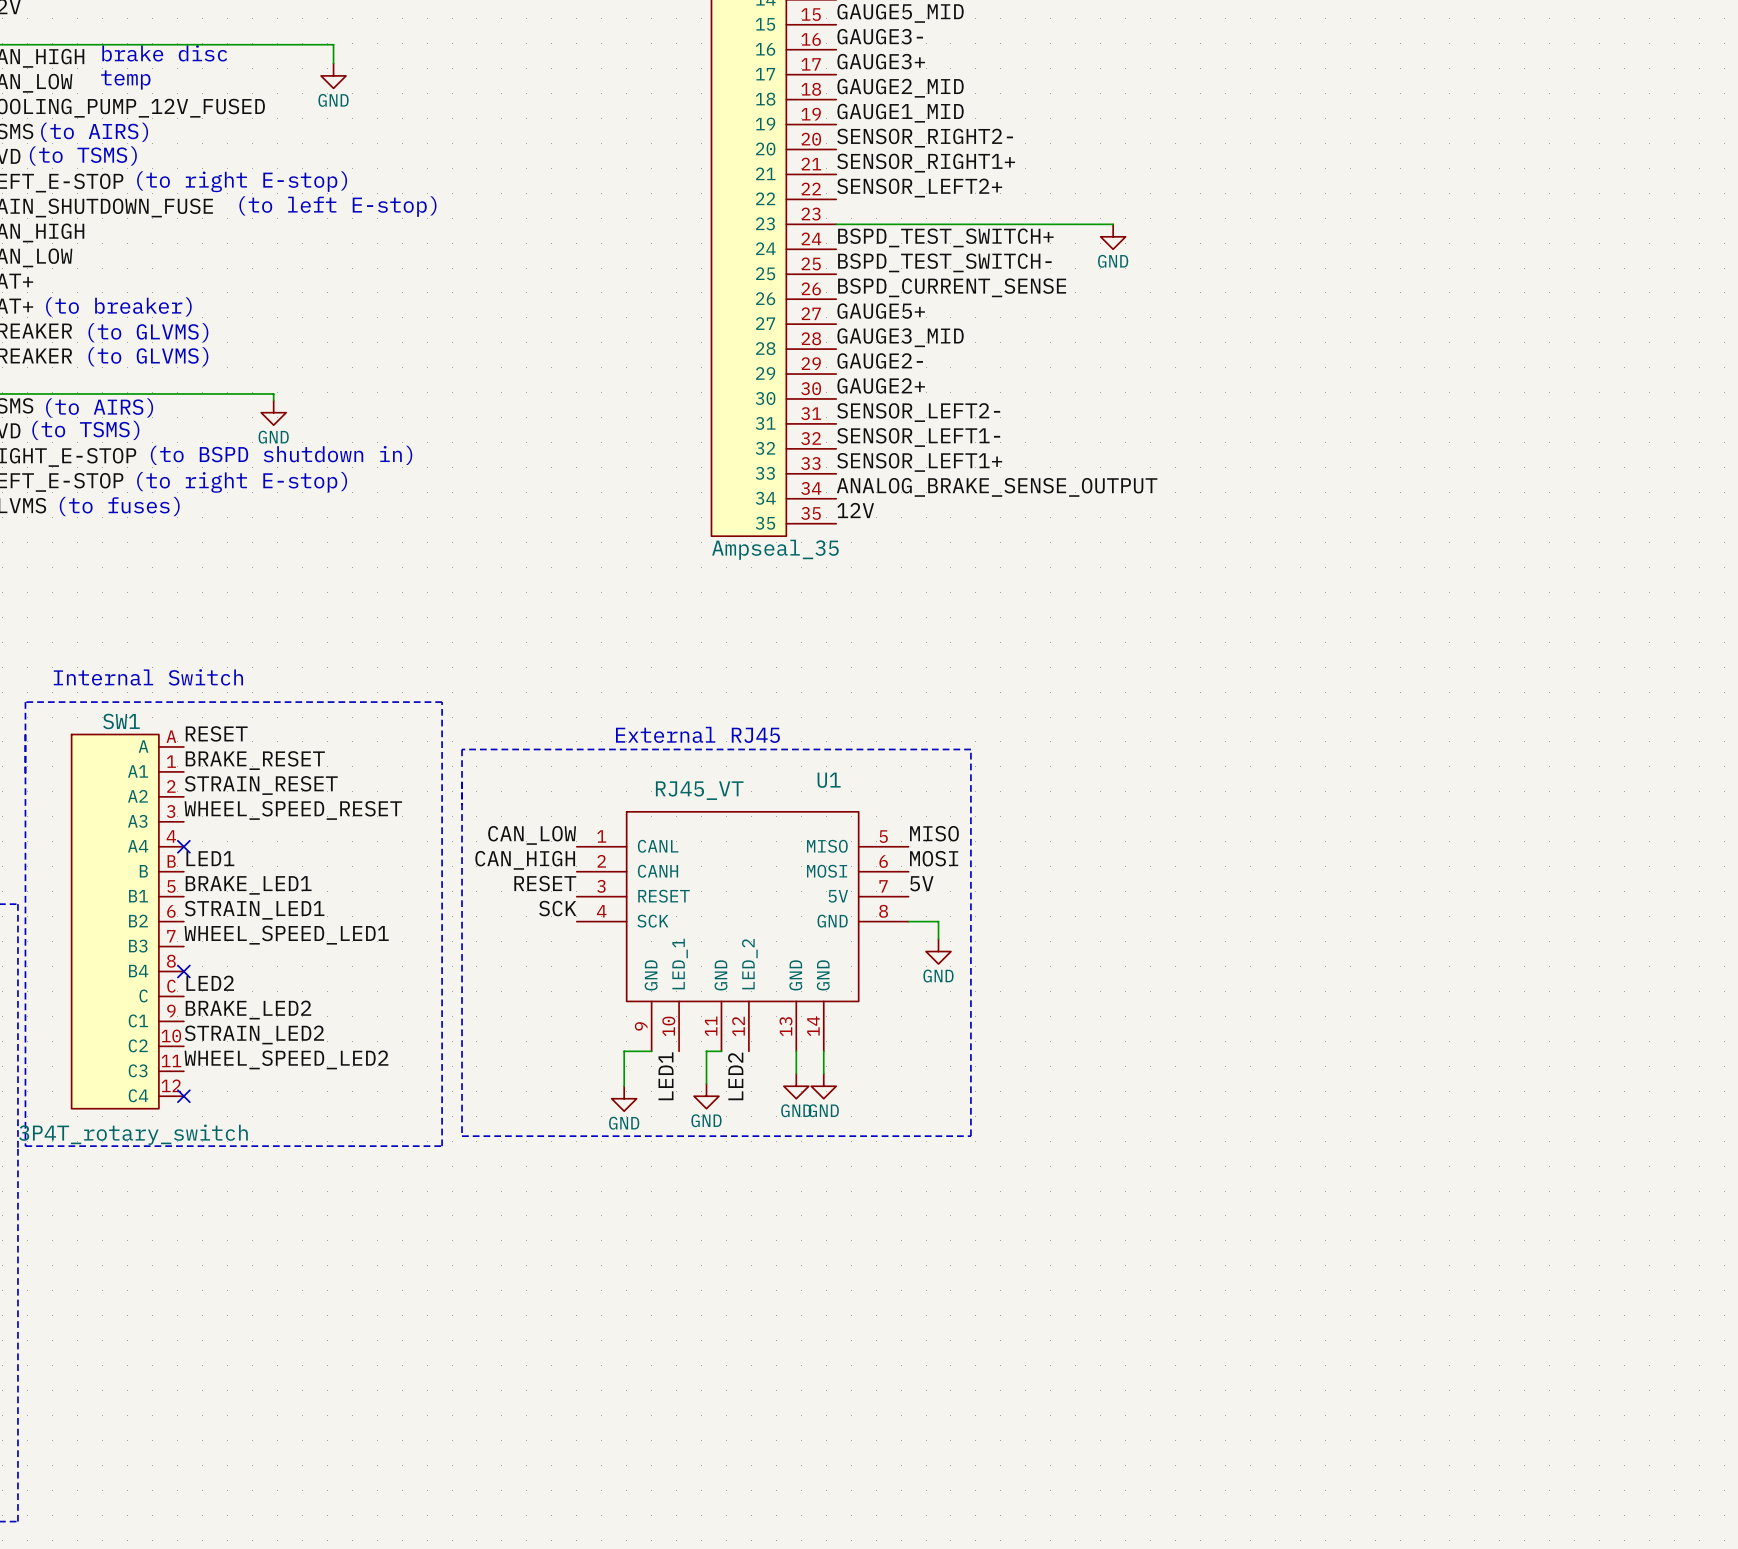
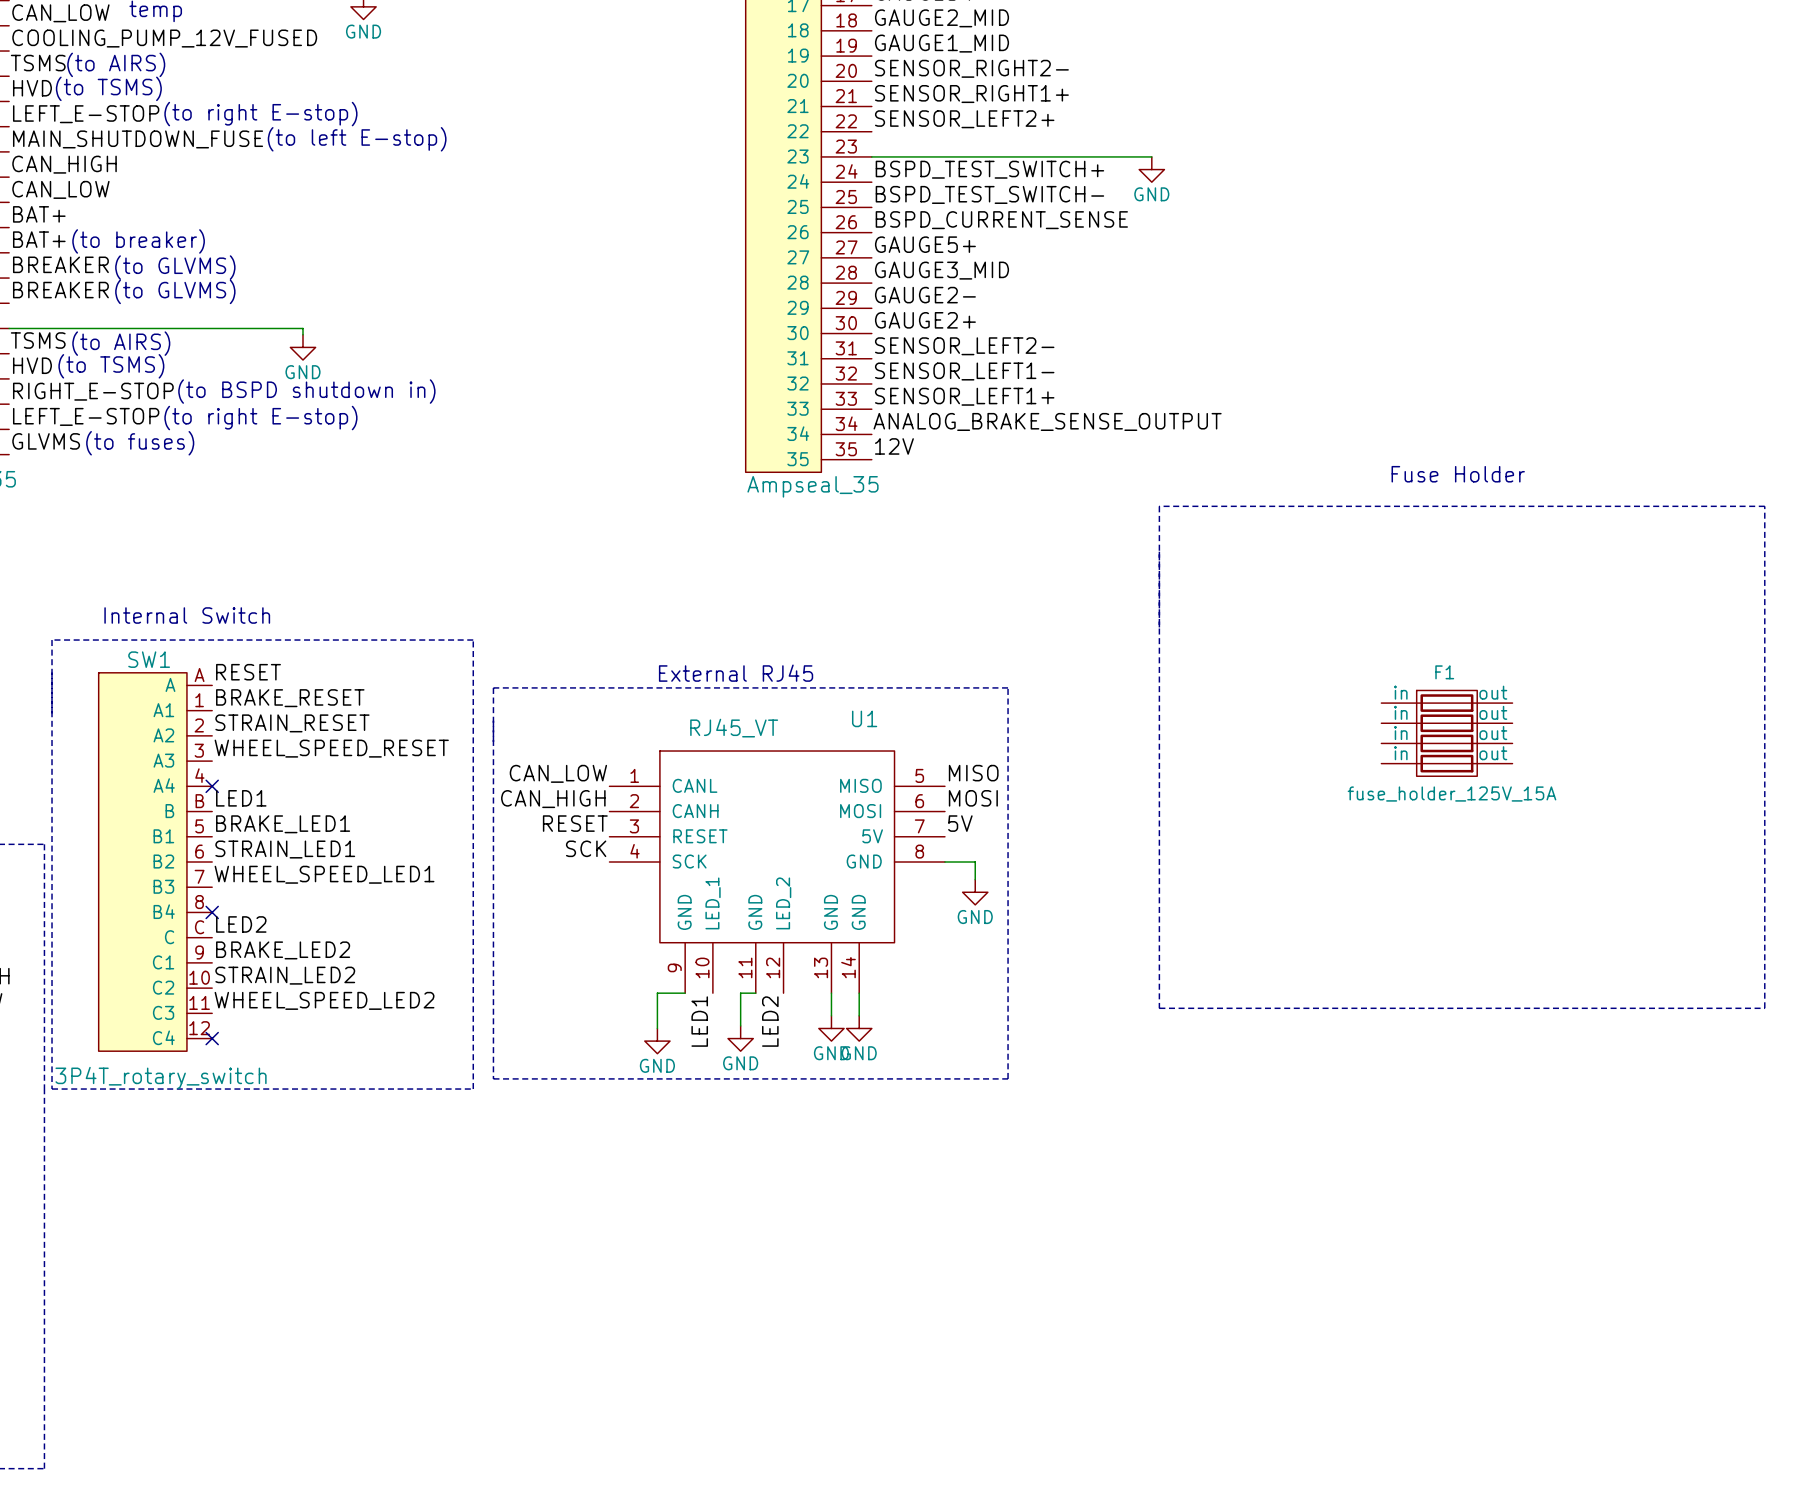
text: none -> Fuse Holder (1458, 474)
line: none -> (1159, 506) (1159, 1008) (1764, 1008) (1764, 506) (1159, 506)
F1: none -> fuse_holder_125V_15A (1446, 733)

